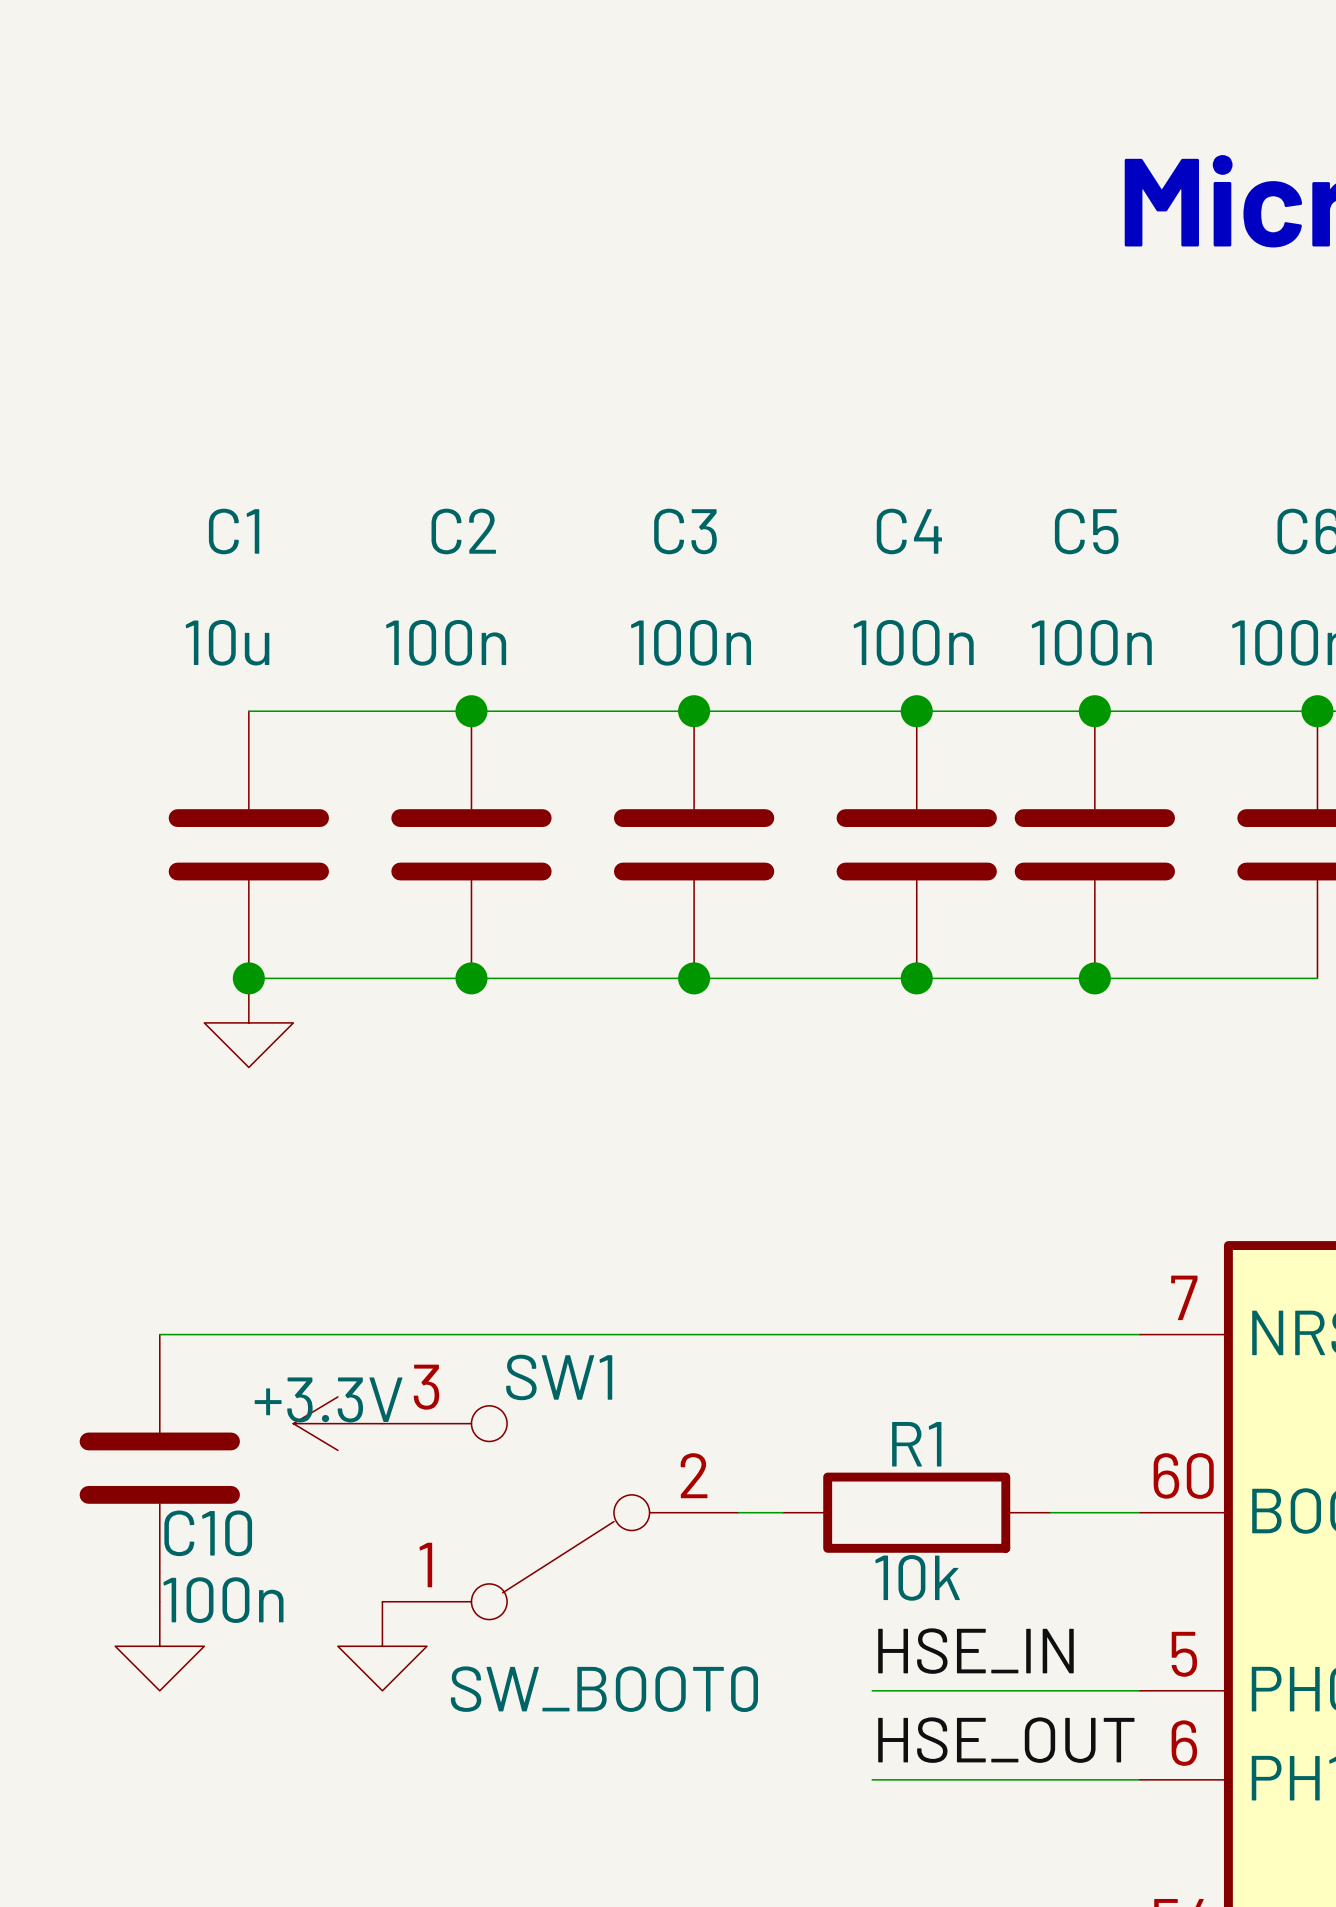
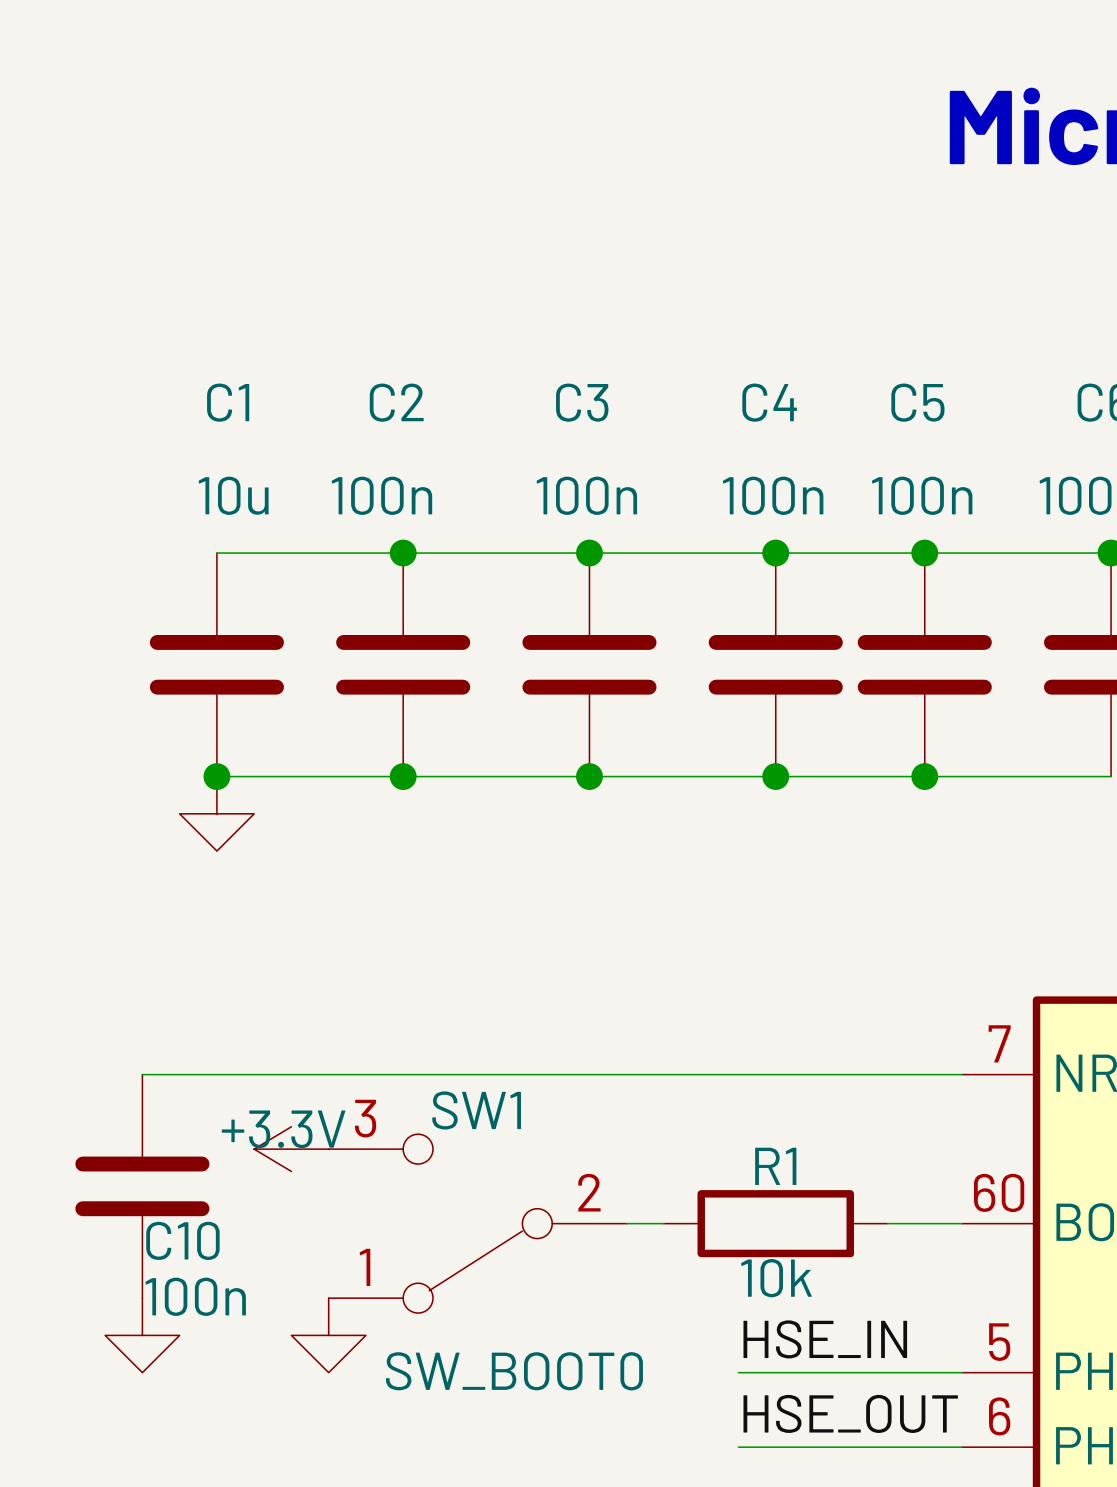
C1 name position: C1 (234, 531) -> C1 (228, 402)
C1 value position: 10u (227, 642) -> 10u (233, 495)

